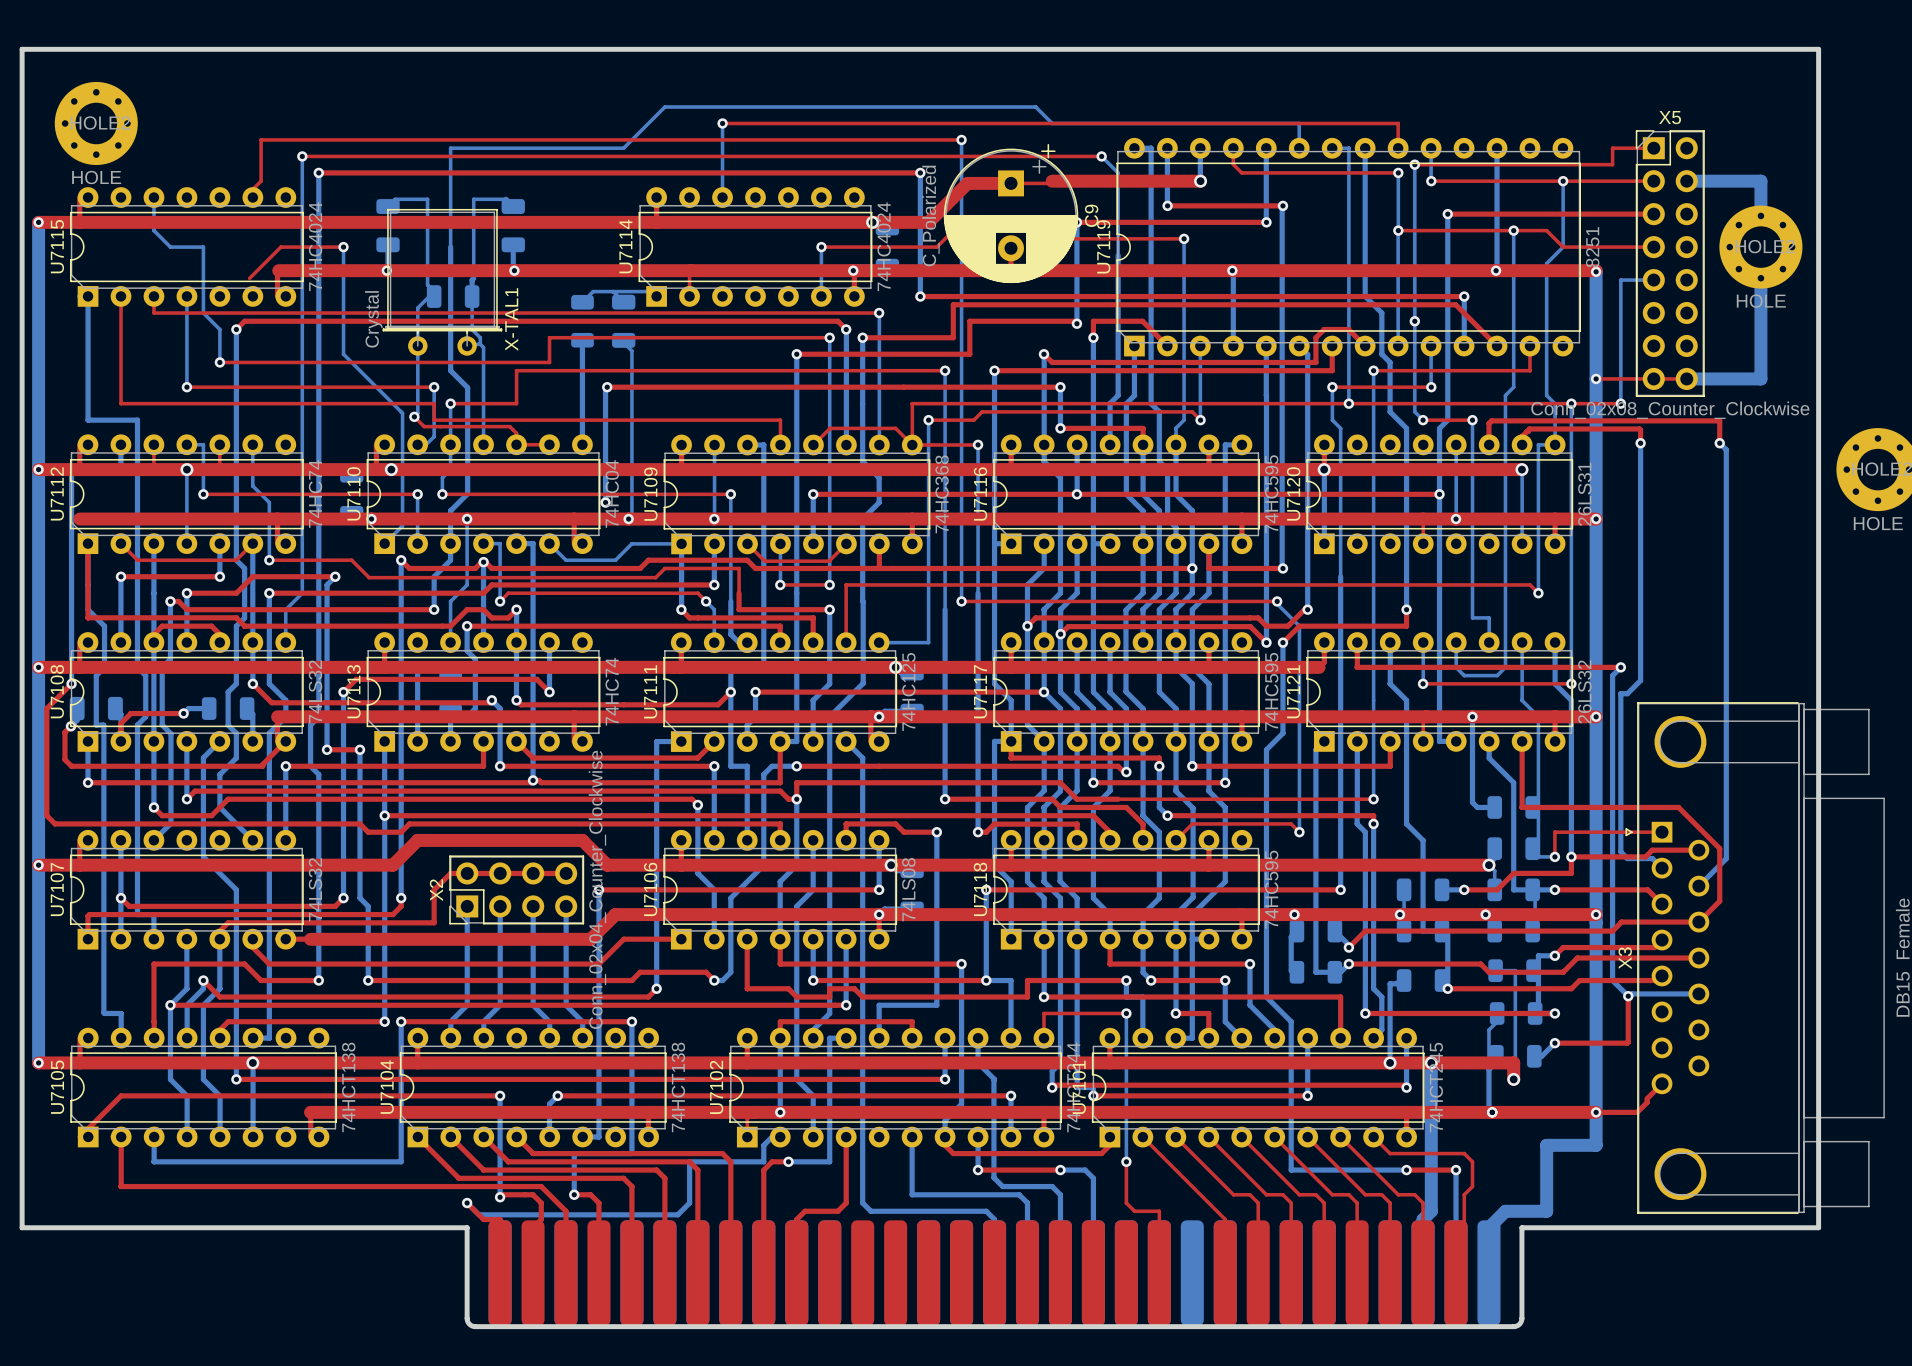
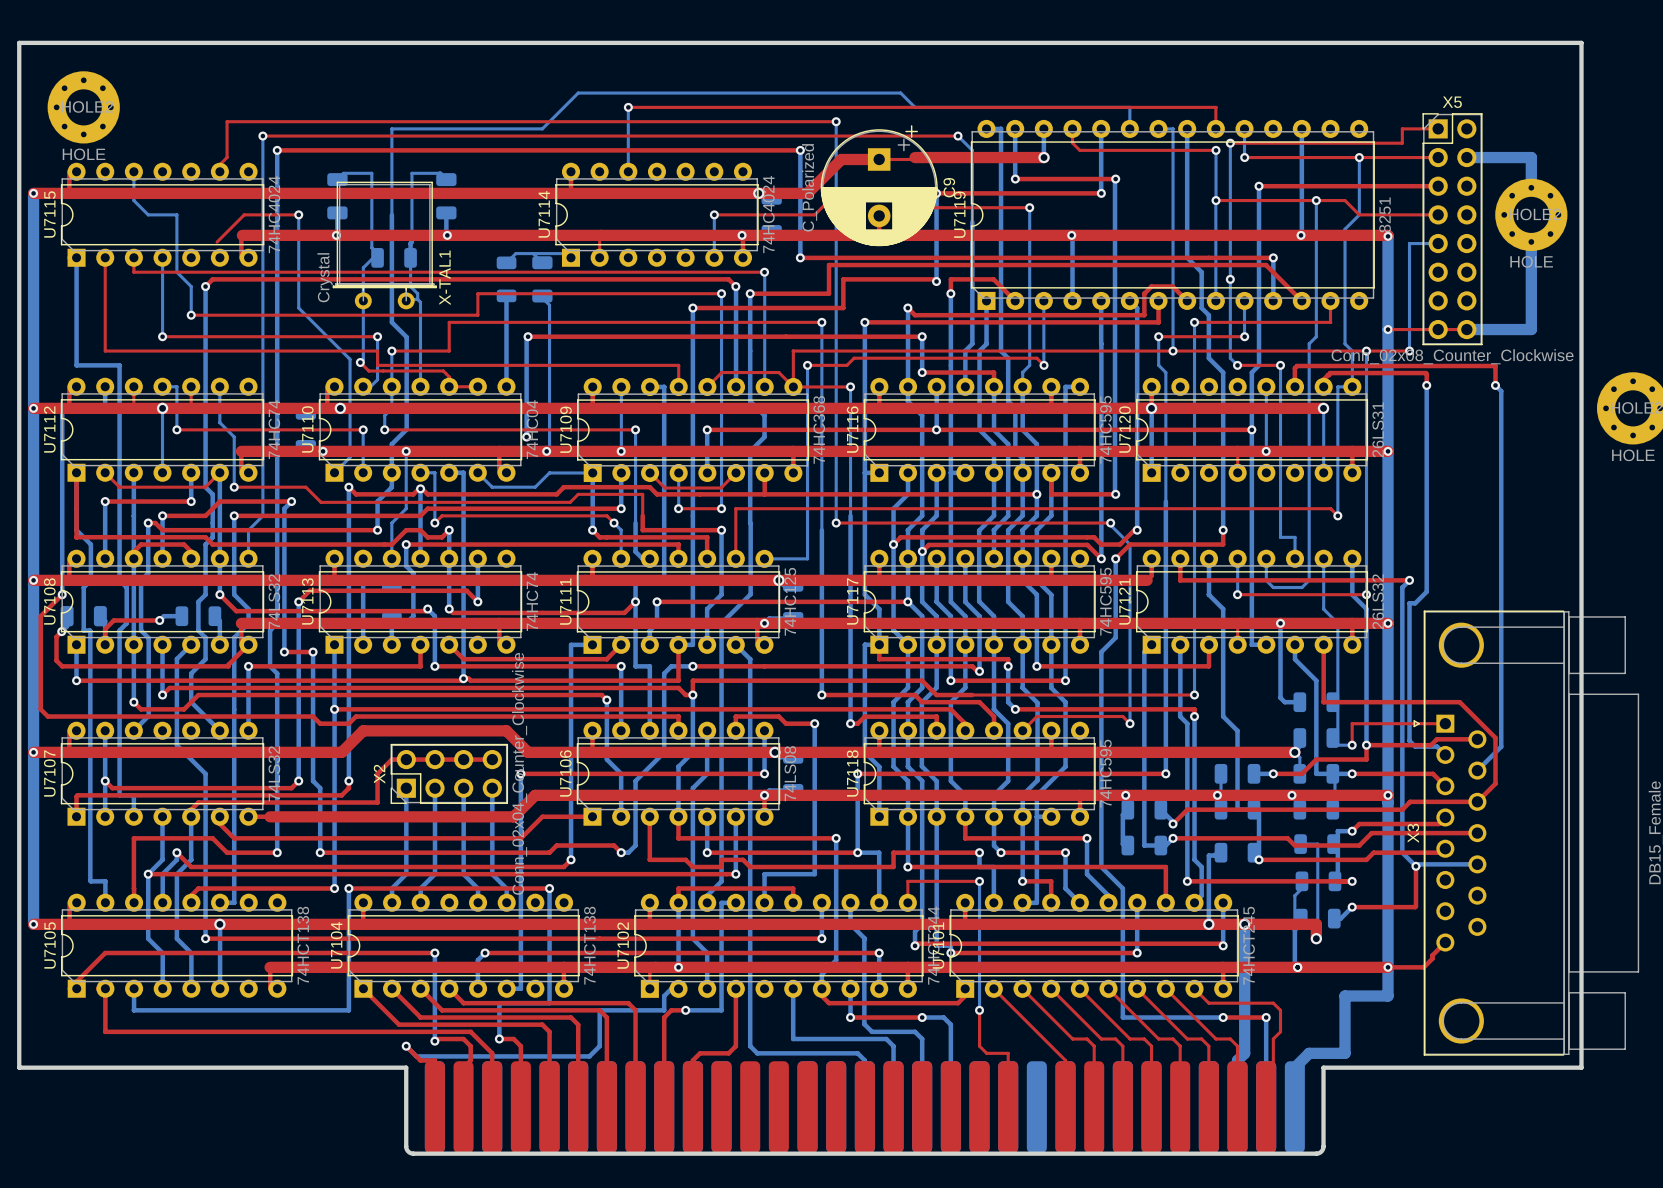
top track: (79, 519) (277, 519) -> none

